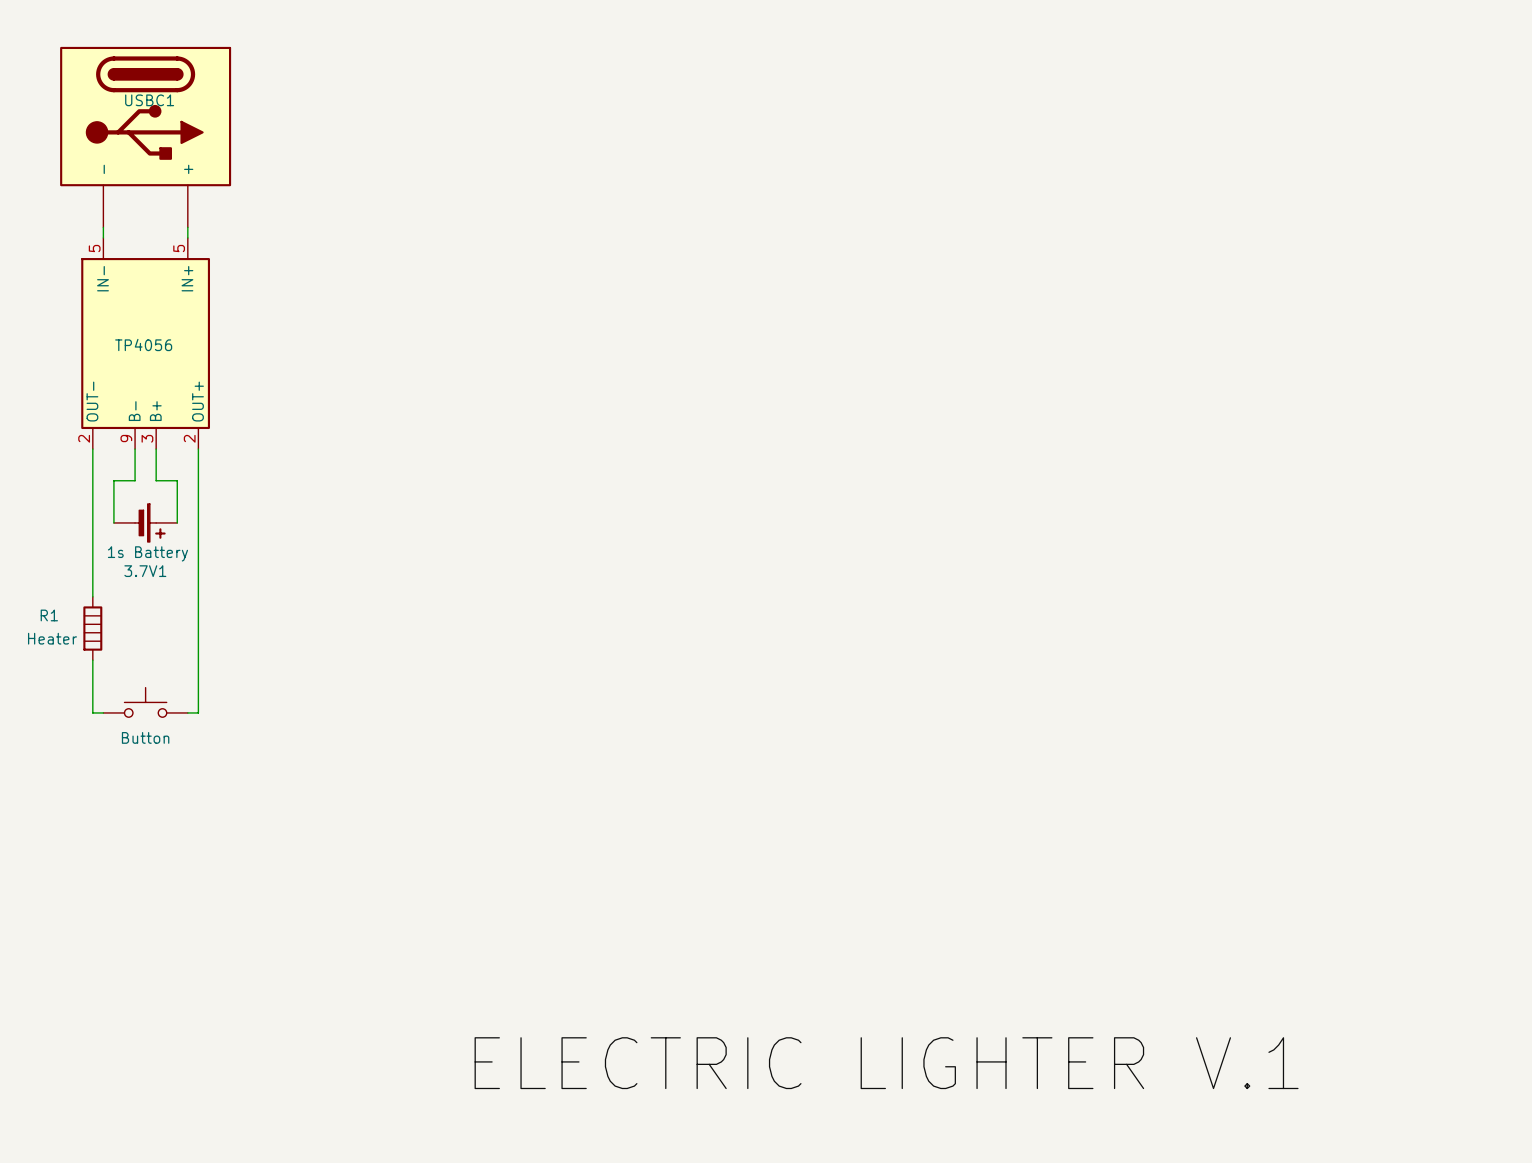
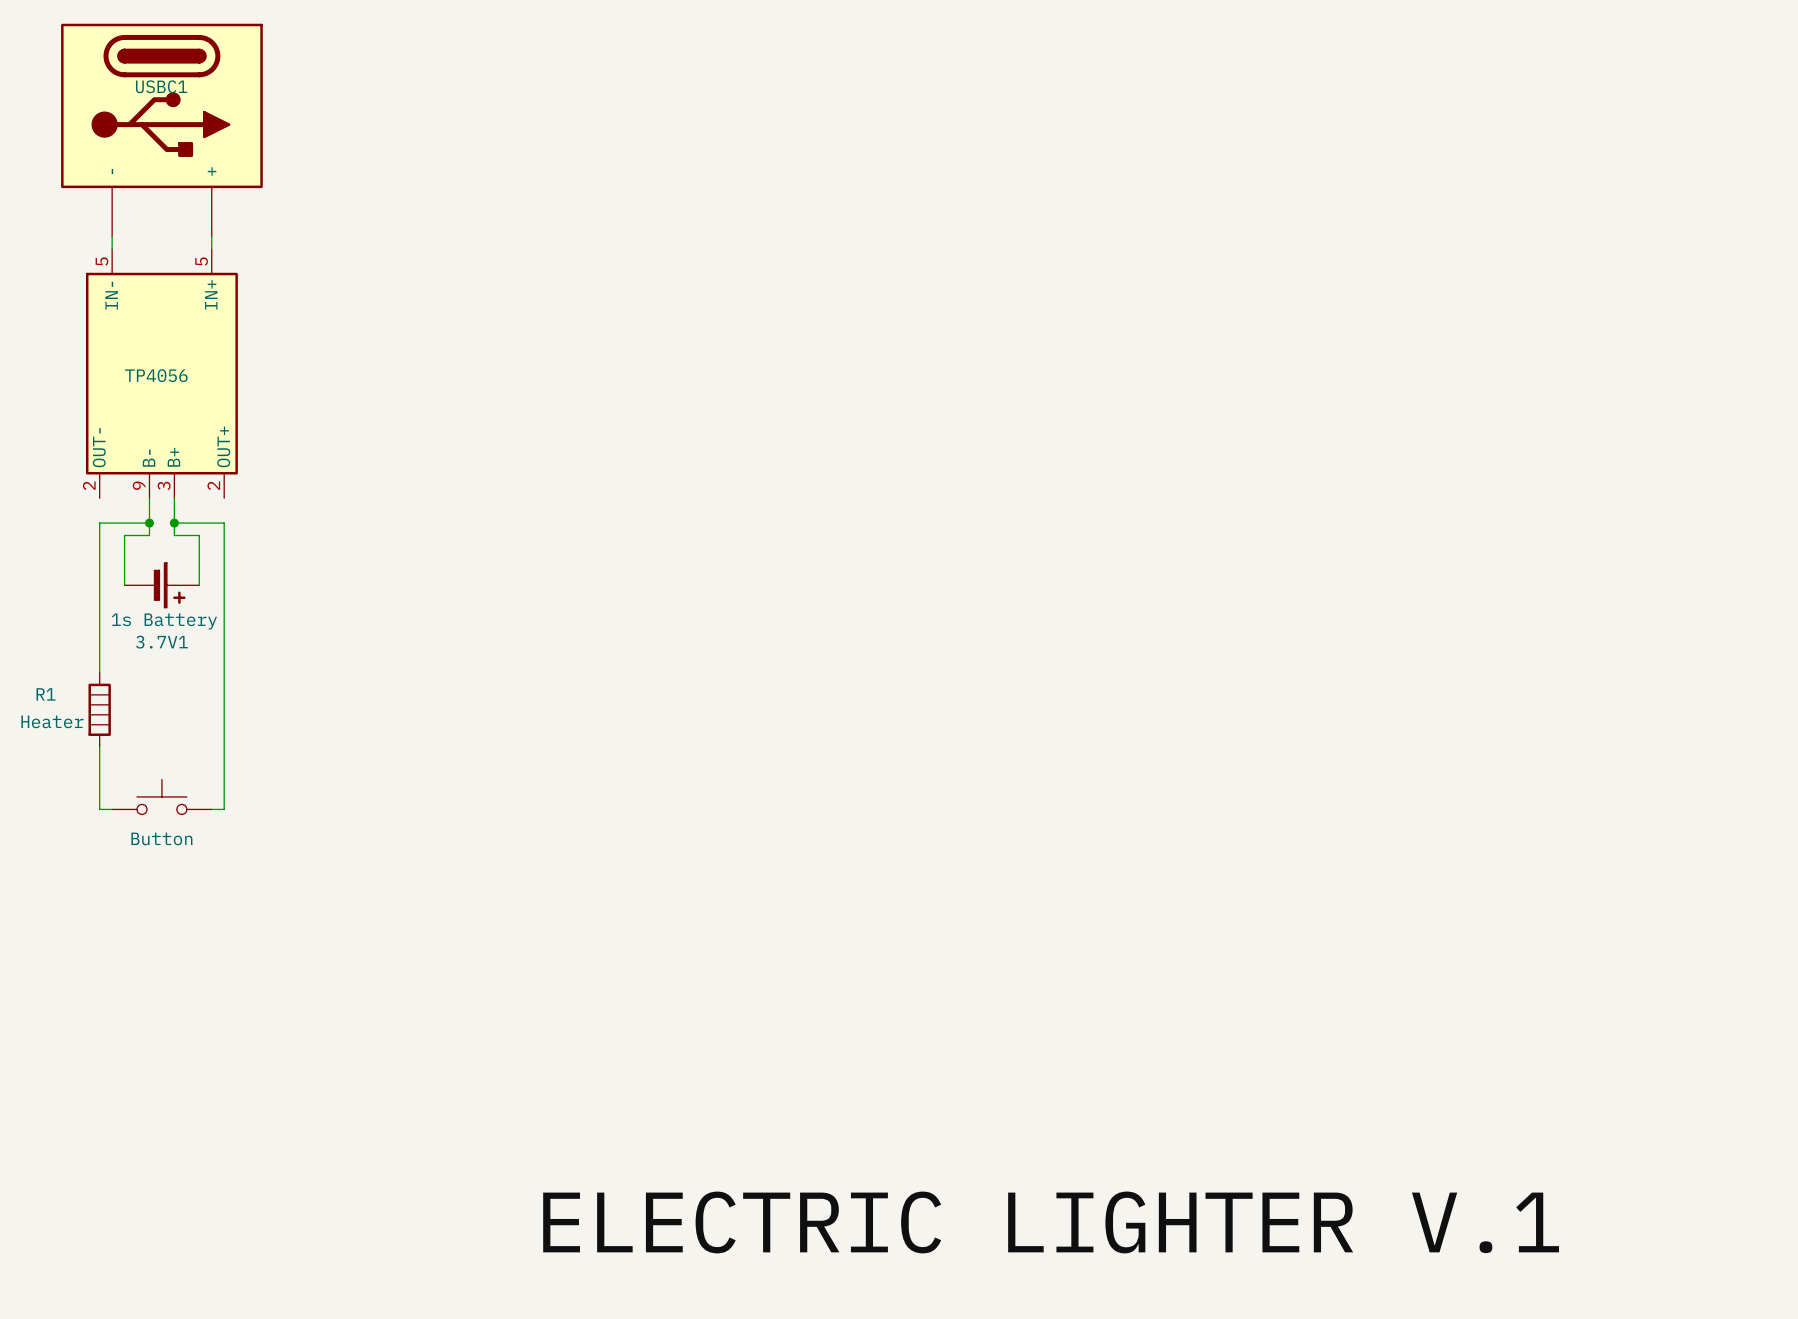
wire: (92, 449) (92, 470) -> (149, 523) (99, 523)
wire: (198, 449) (198, 470) -> (174, 523) (224, 523)
junction: none -> (149, 523)
junction: none -> (174, 523)

